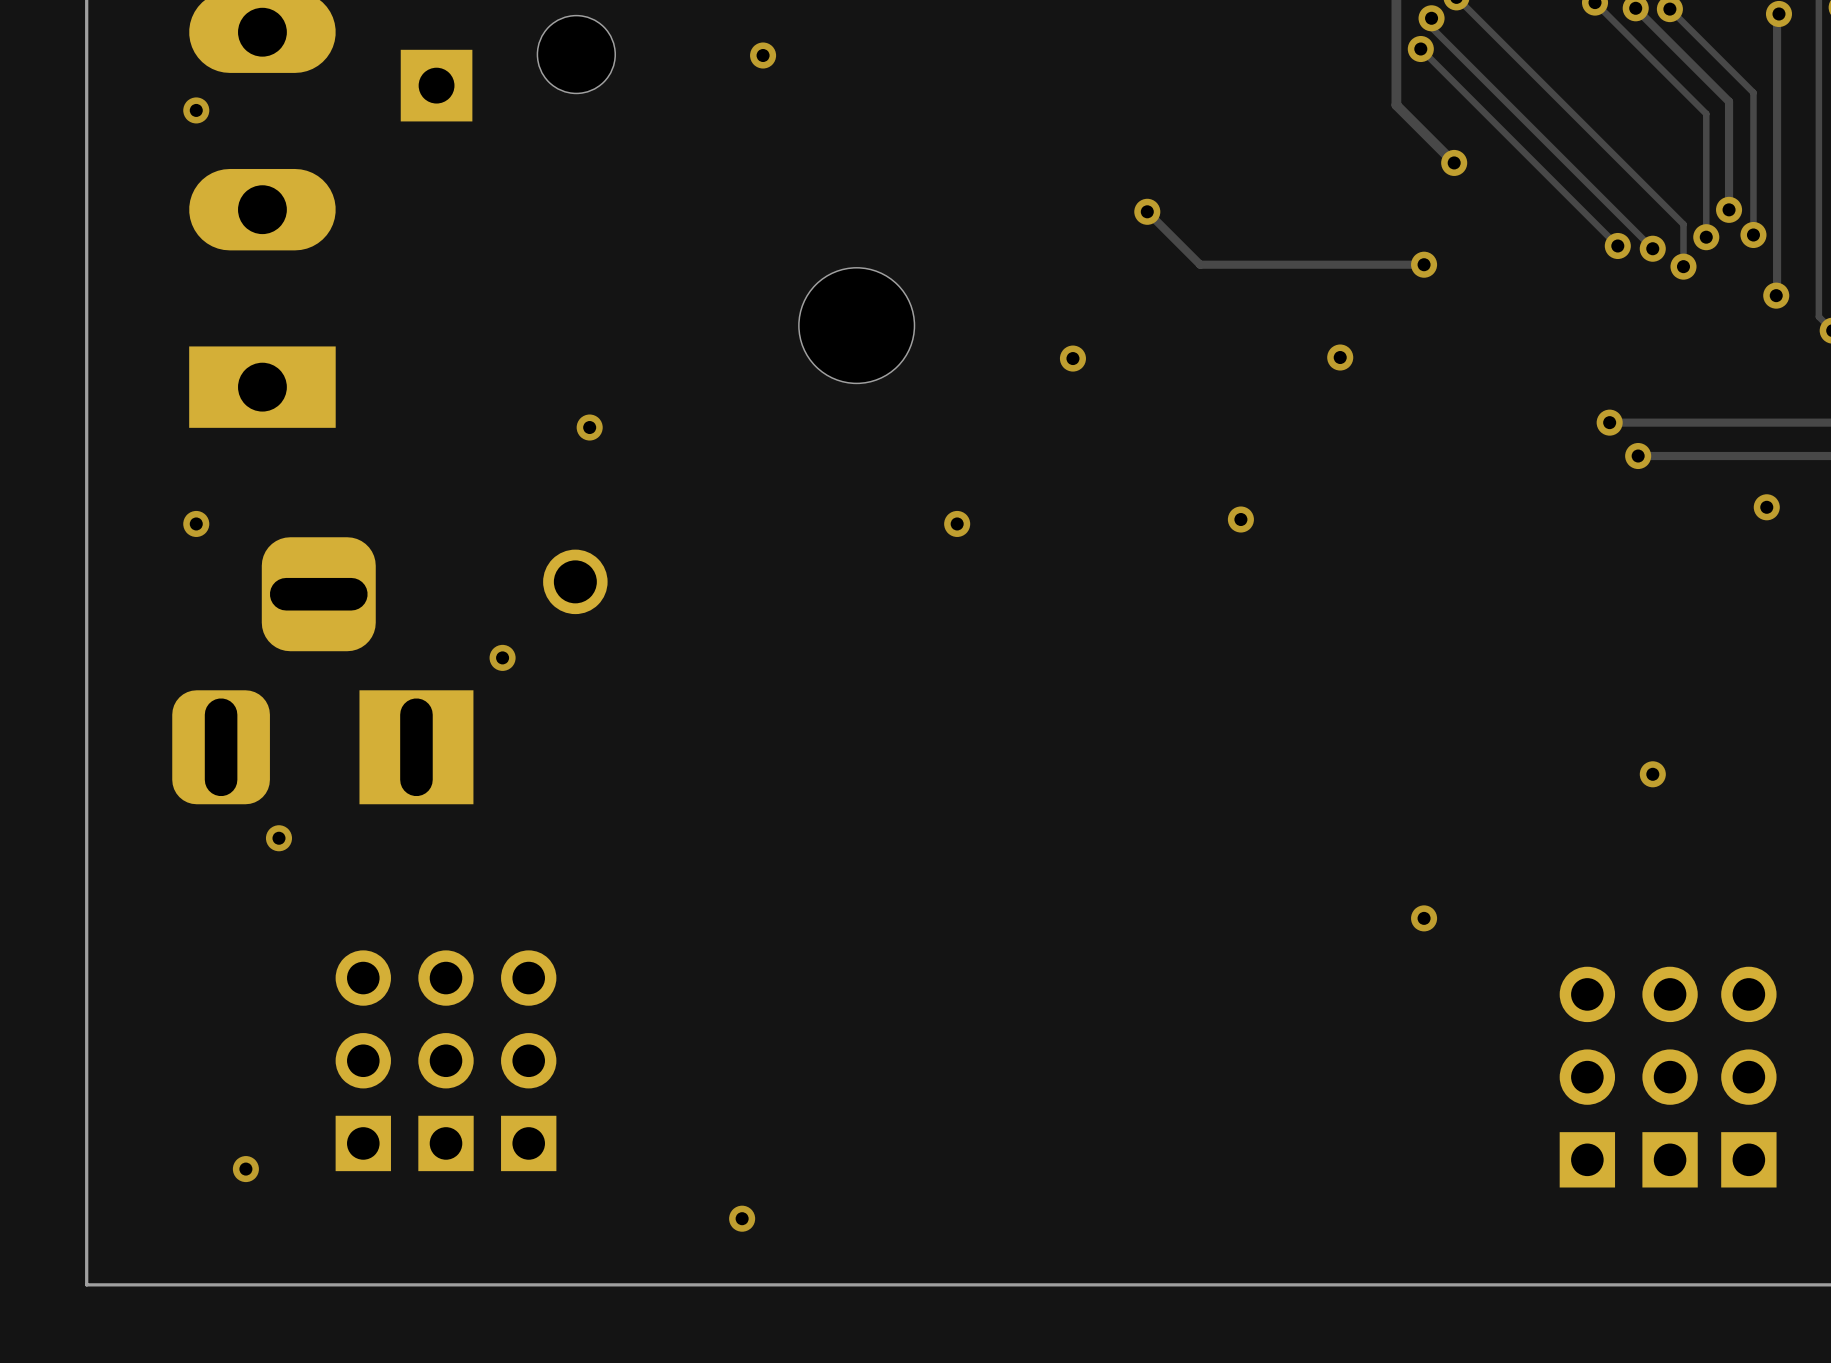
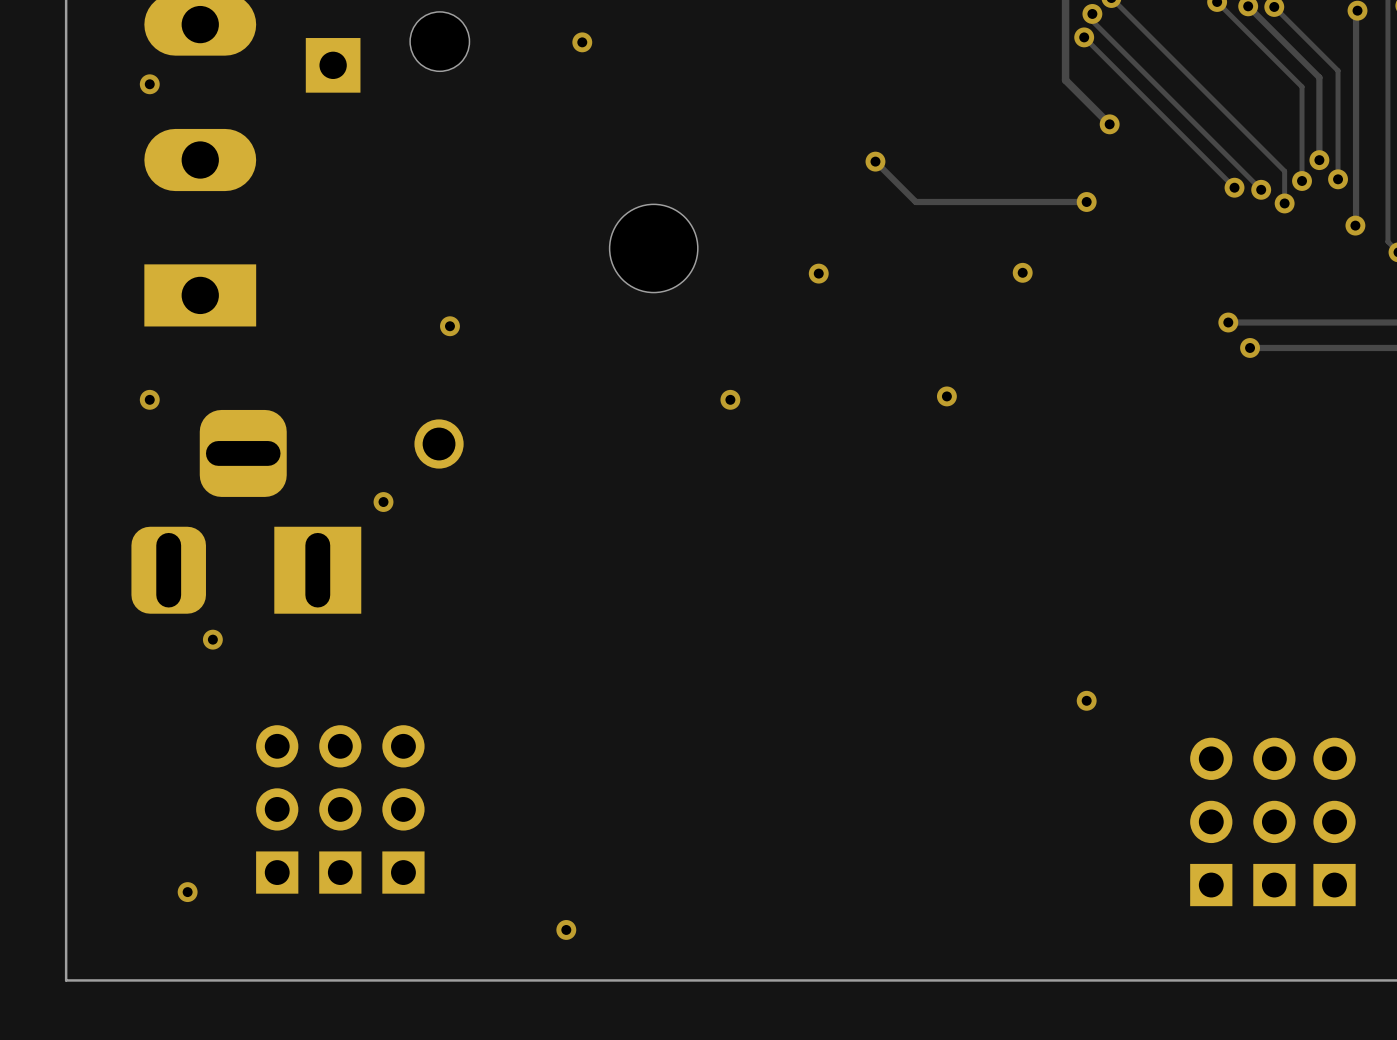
via: (1766, 507) -> none
via: (1652, 774) -> none

